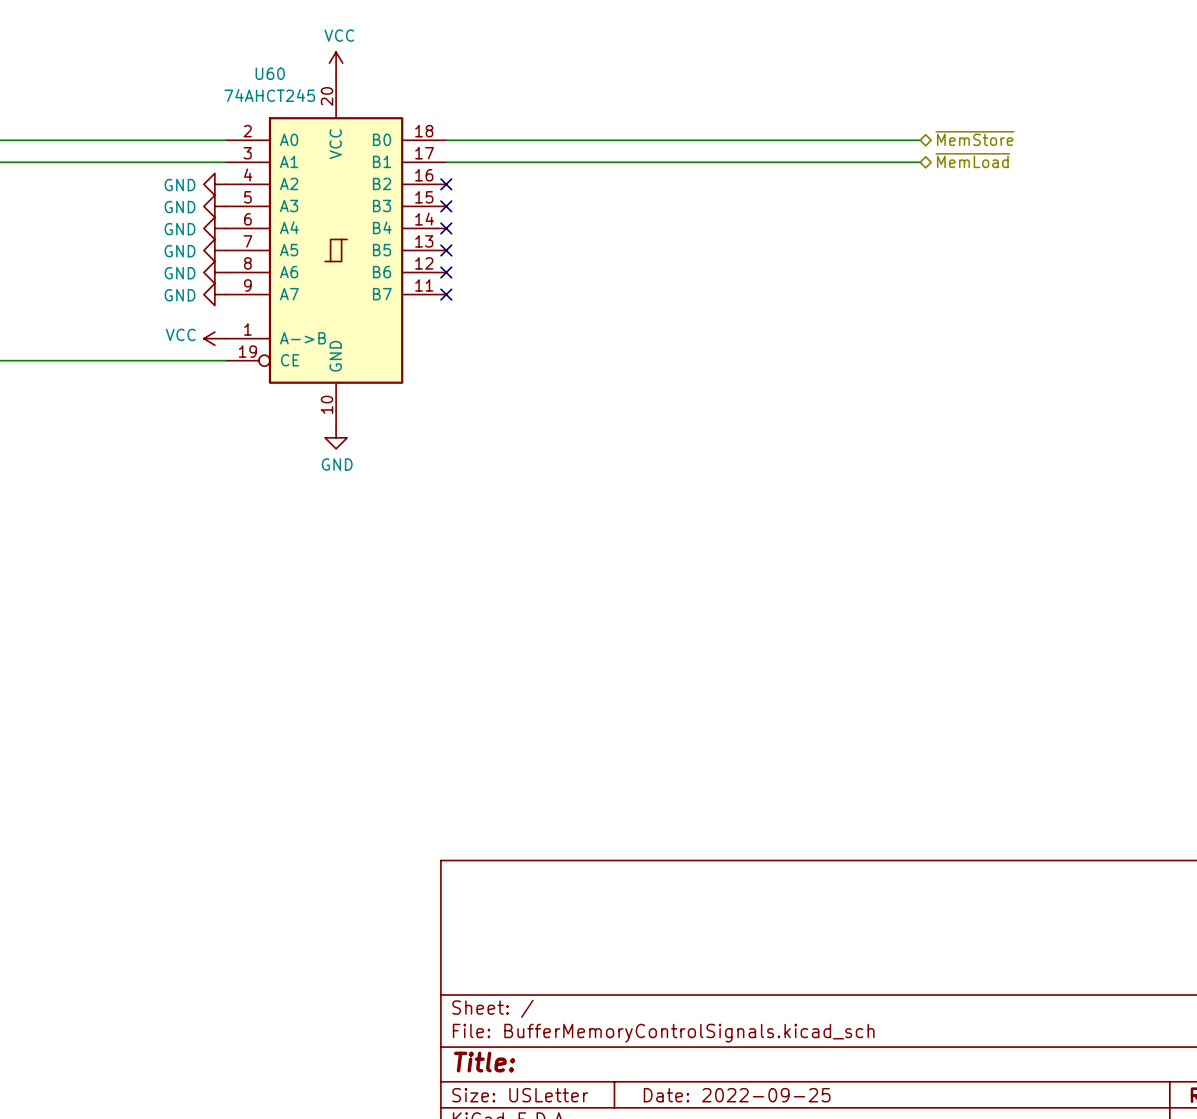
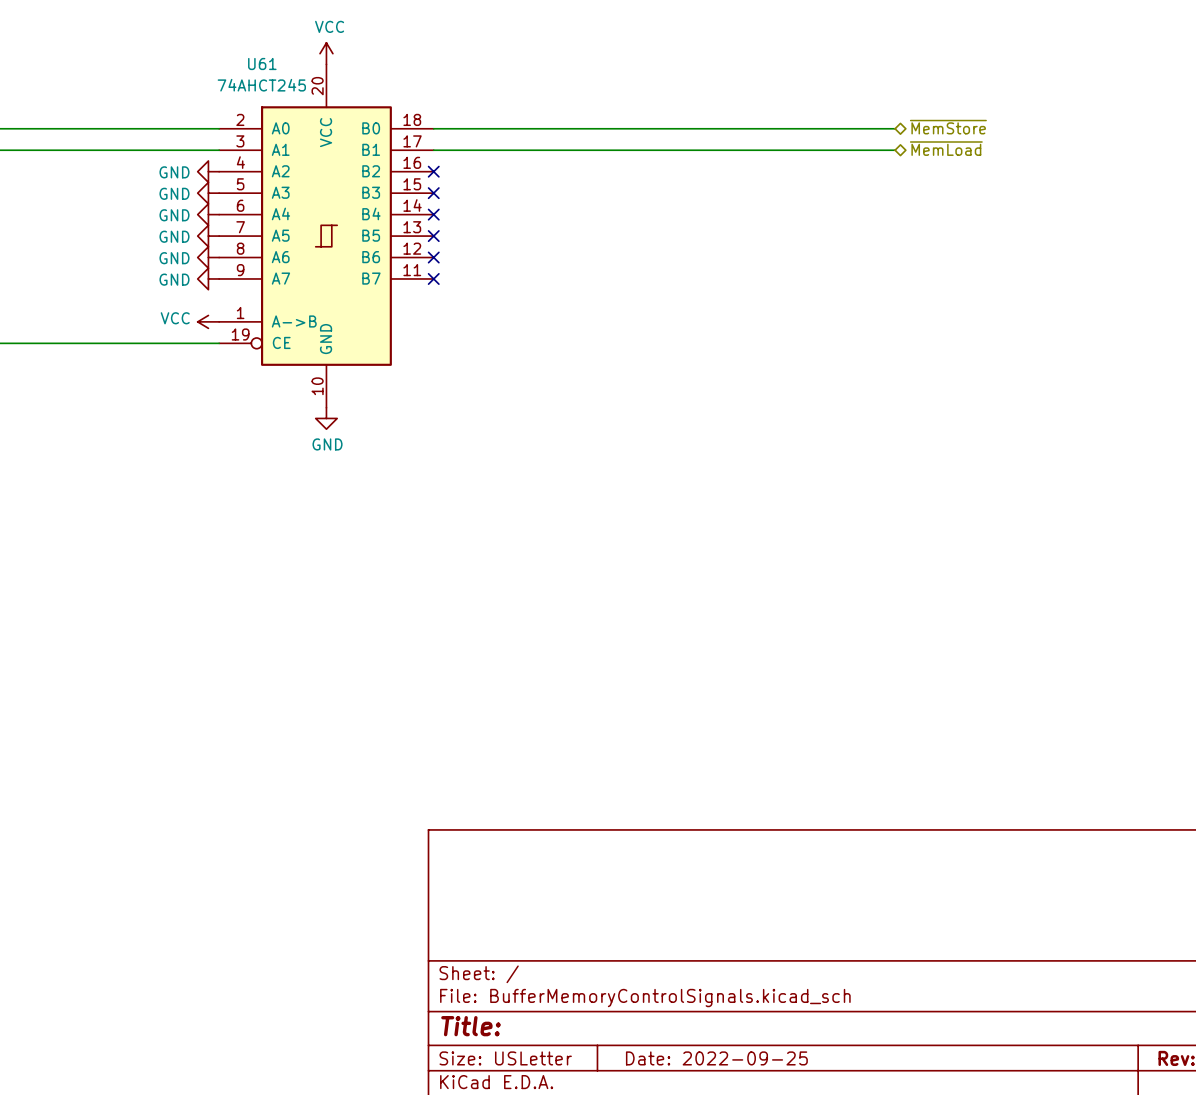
U60 name: U60 (270, 73) -> U61 (262, 64)

